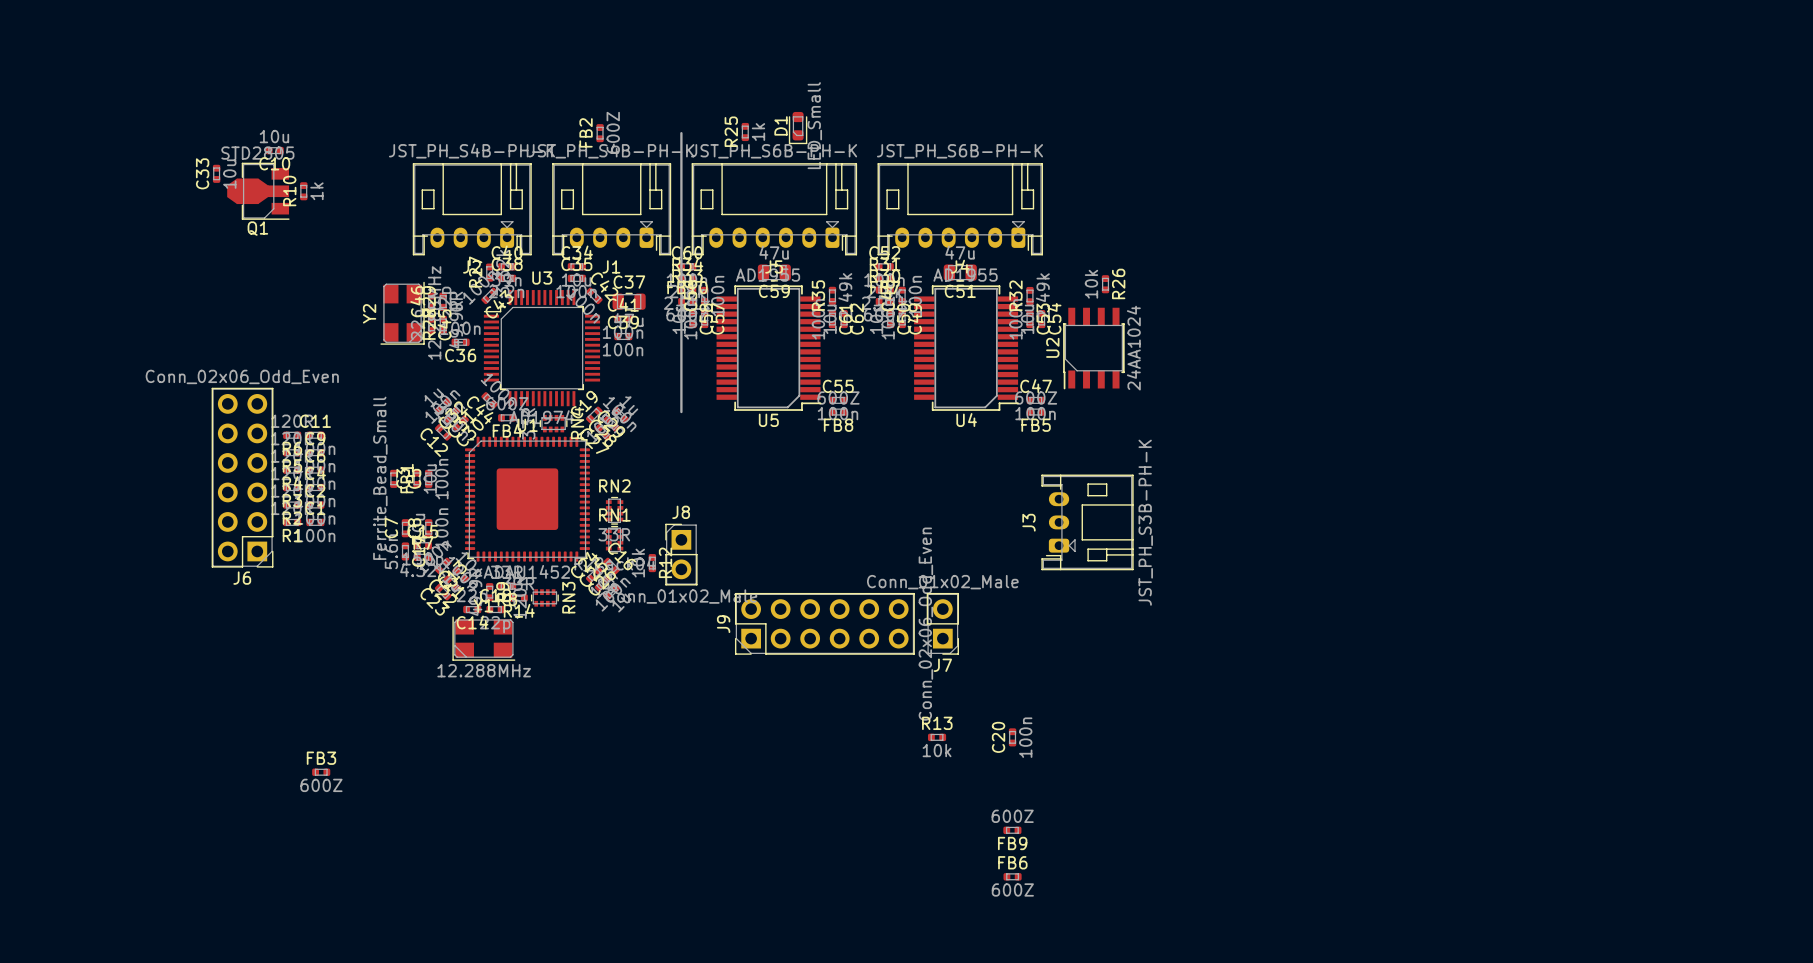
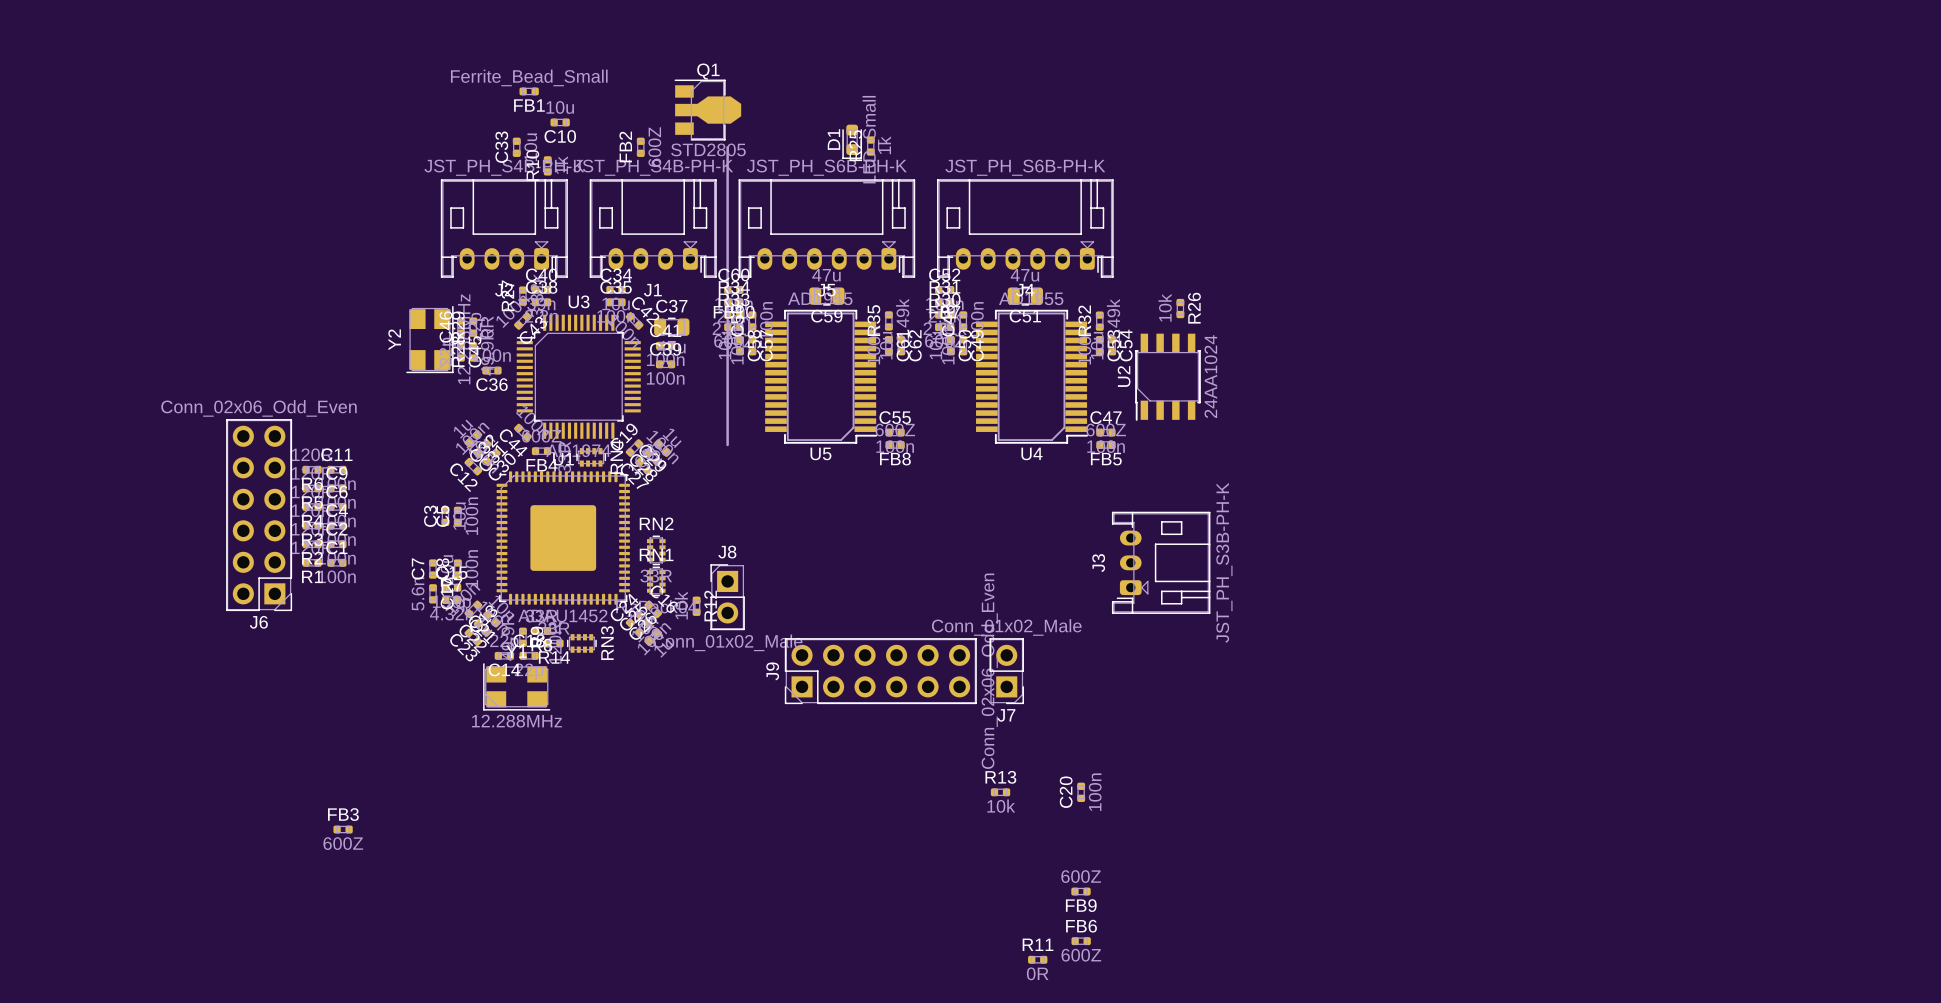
R25 position: (745, 132) -> (870, 146)
C10 position: (274, 150) -> (560, 122)
C33 position: (216, 173) -> (516, 147)
Q1 rotation: 0° (258, 191) -> 180° (707, 110)
Q1 position: (258, 191) -> (707, 110)
R10 position: (303, 191) -> (547, 165)
FB1 rotation: 0° (393, 478) -> 90° clockwise (529, 91)
FB1 position: (393, 478) -> (529, 91)
R11: none -> 0R (1037, 959)

